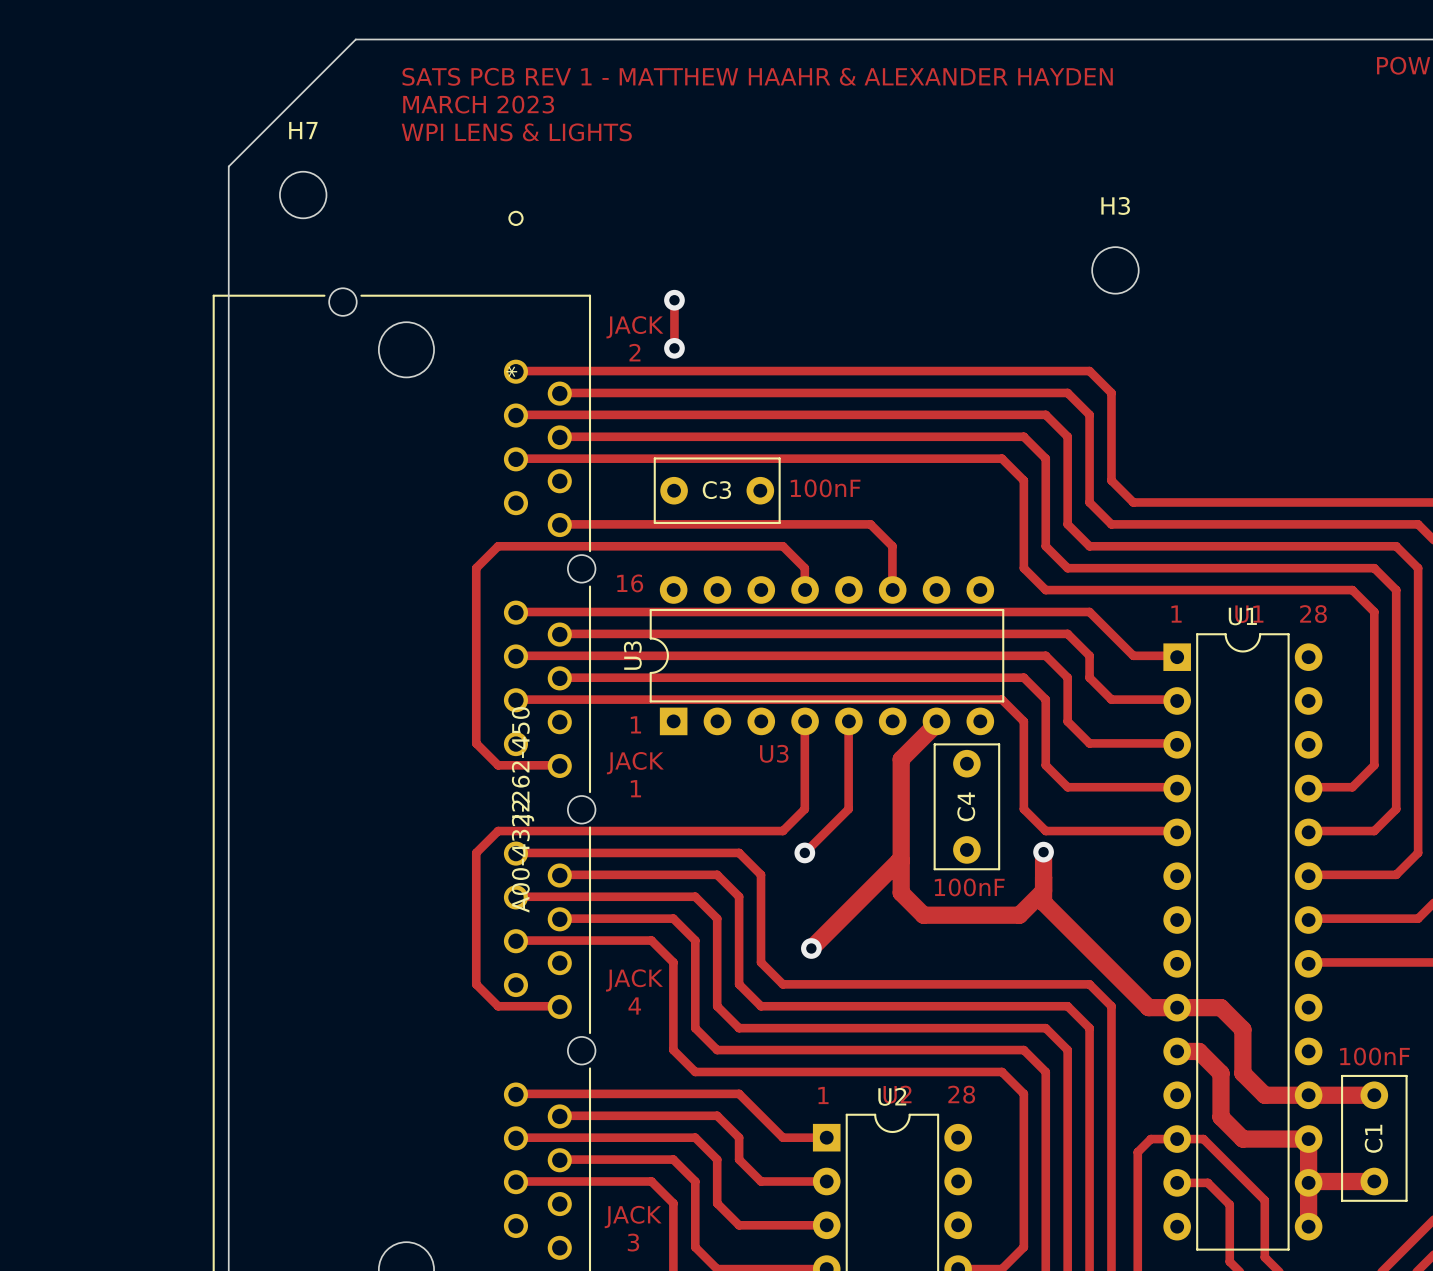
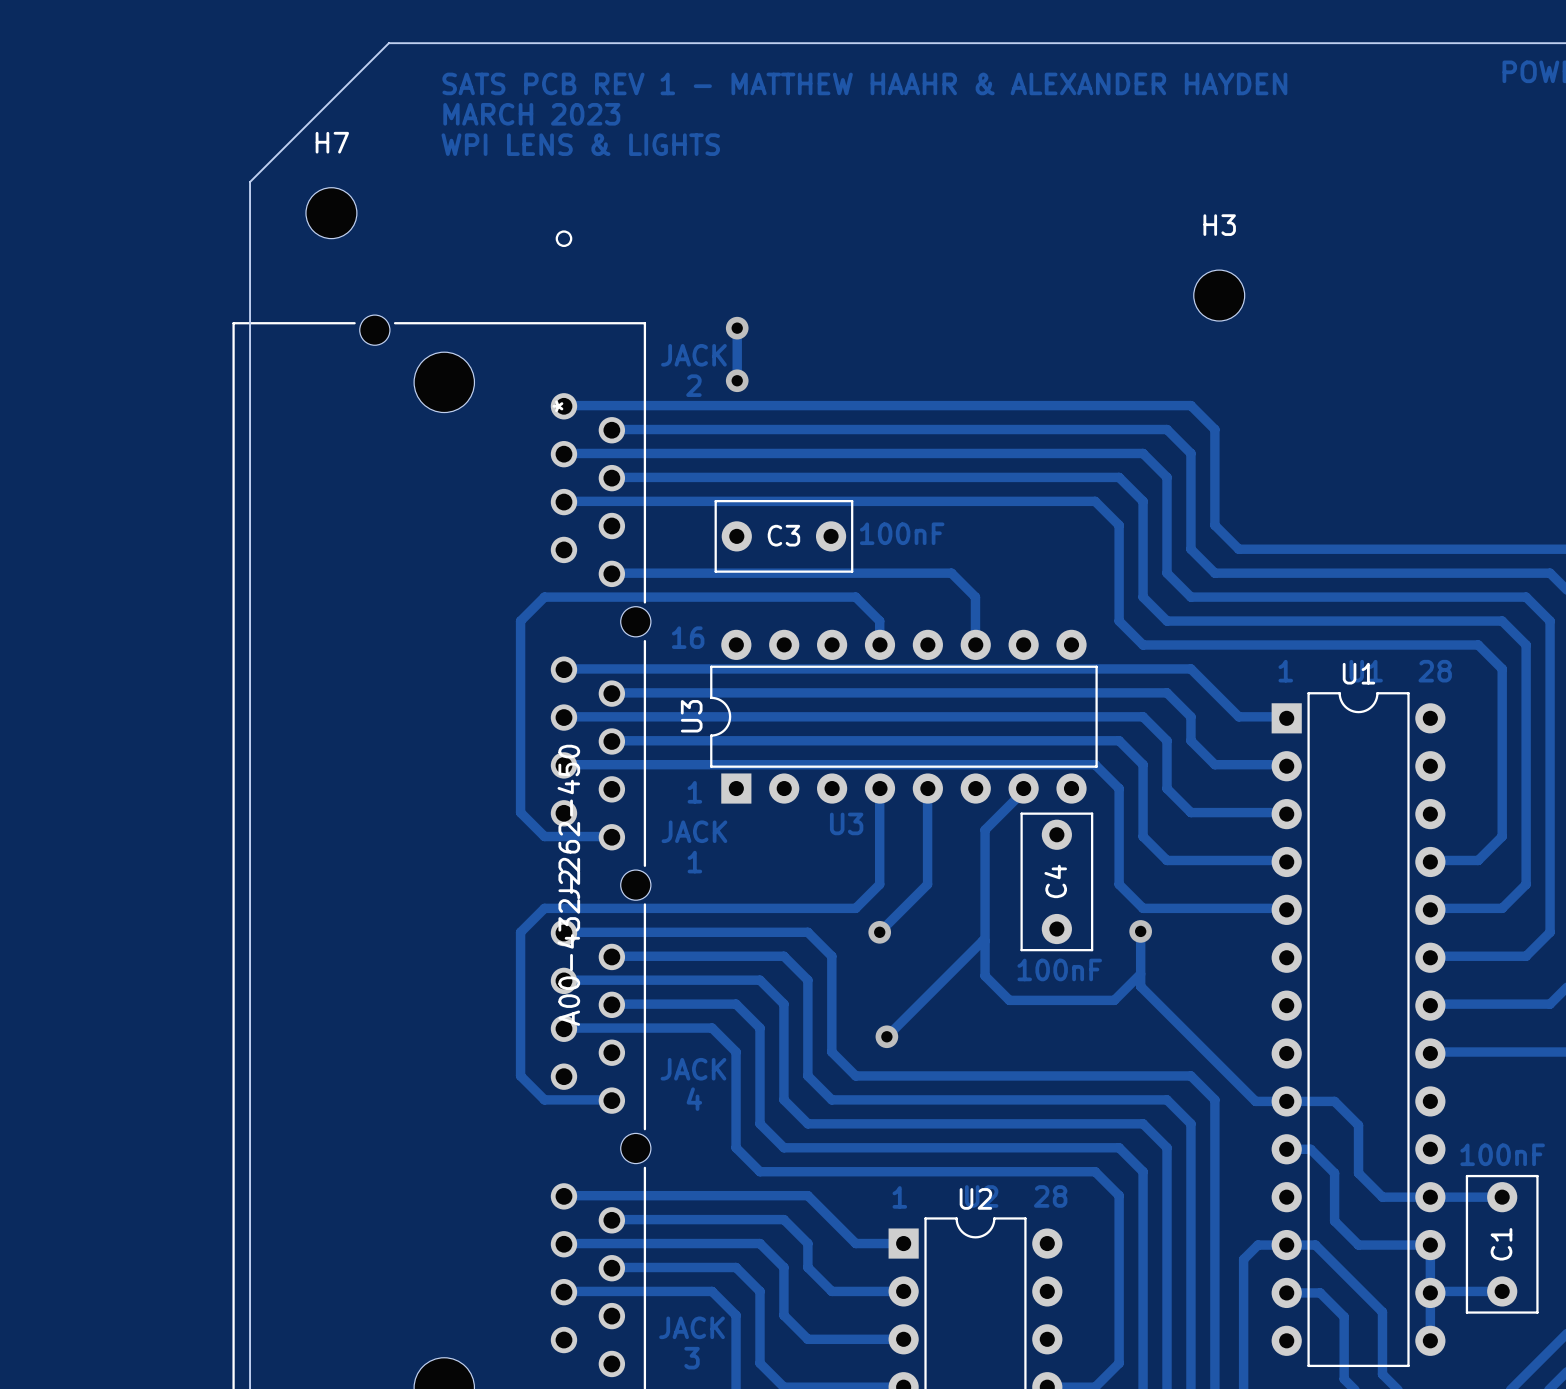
track width: thick (936, 724) (901, 759) (901, 892) (923, 915) (1019, 915) (1043, 891) -> thin (1023, 791) (985, 829) (985, 975) (1009, 1000) (1114, 1000) (1140, 974)
track width: thick (1043, 852) (1043, 902) (1148, 1007) (1220, 1007) (1242, 1029) (1242, 1073) (1264, 1095) (1374, 1095) -> thin (1140, 931) (1140, 986) (1255, 1101) (1334, 1101) (1358, 1125) (1358, 1173) (1382, 1197) (1502, 1197)
track width: thick (901, 860) (899, 860) (811, 948) -> thin (985, 940) (982, 940) (886, 1036)
track width: thick (1177, 1051) (1199, 1051) (1220, 1073) (1220, 1117) (1242, 1139) (1308, 1139) (1308, 1226) -> thin (1286, 1149) (1310, 1149) (1334, 1173) (1334, 1221) (1358, 1245) (1430, 1245) (1430, 1340)
track width: thick (1309, 1181) (1374, 1181) -> thin (1431, 1291) (1502, 1291)

